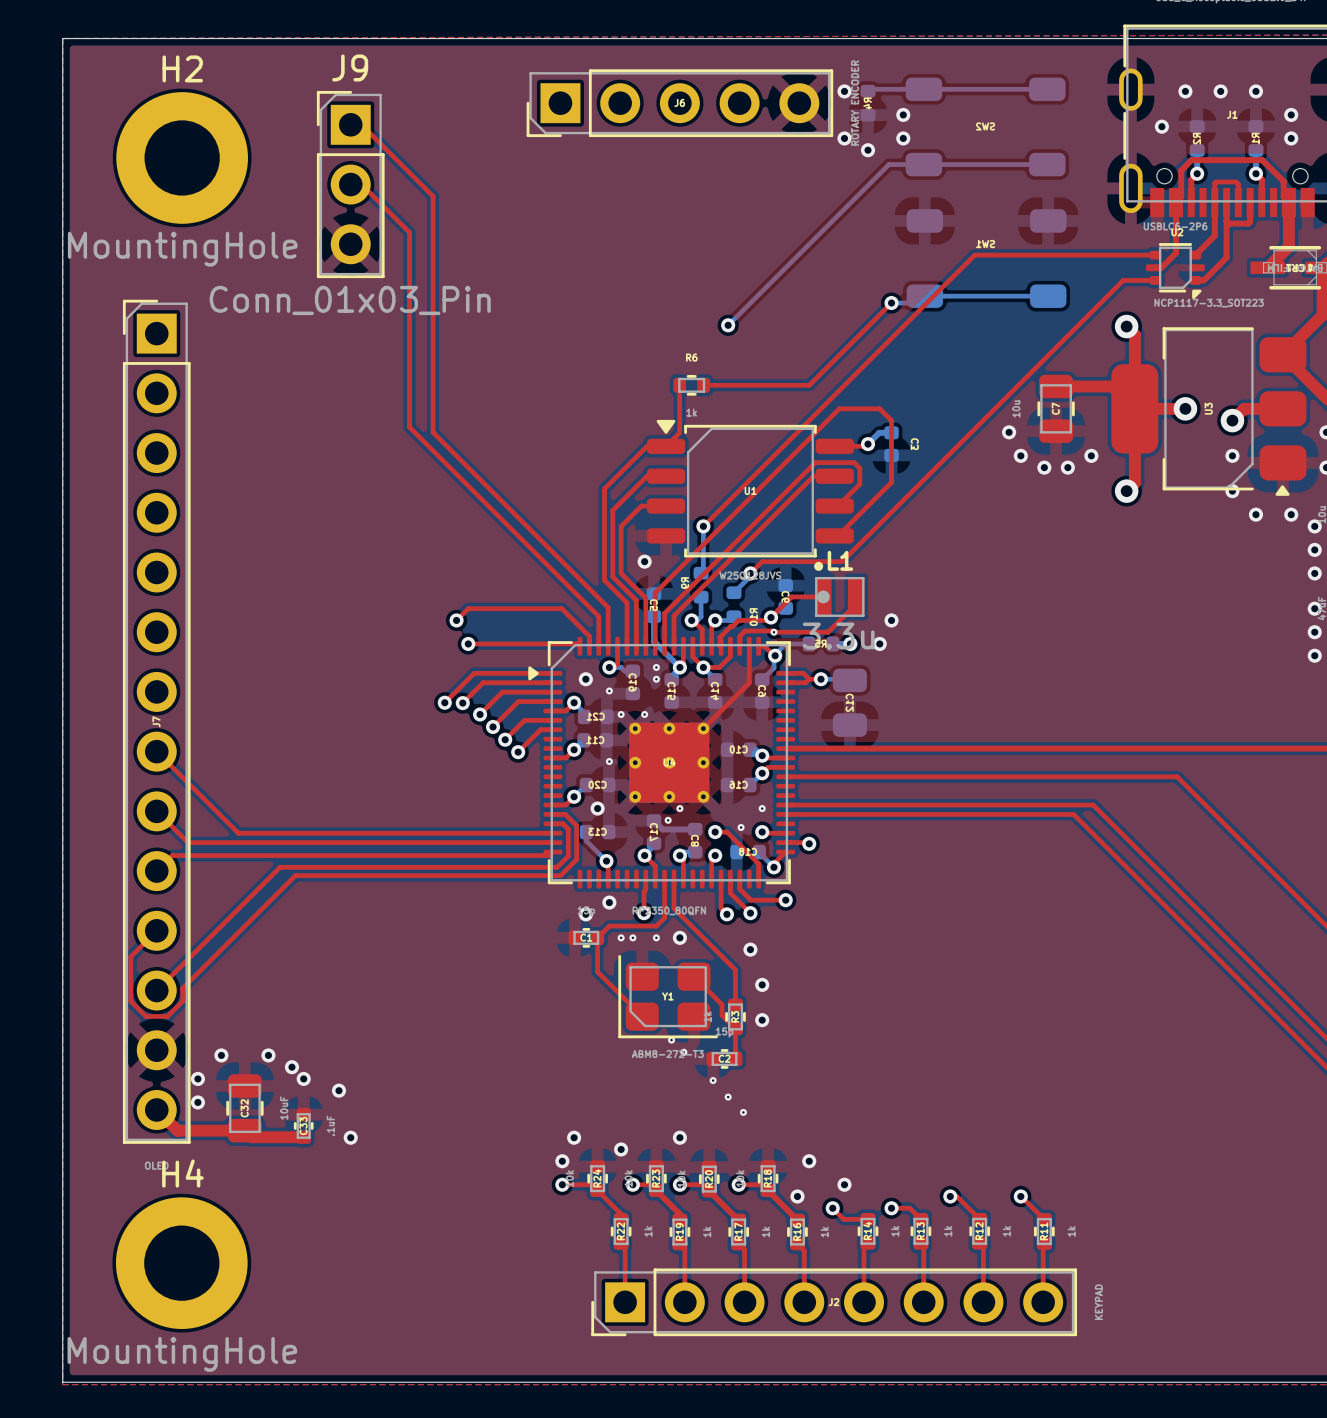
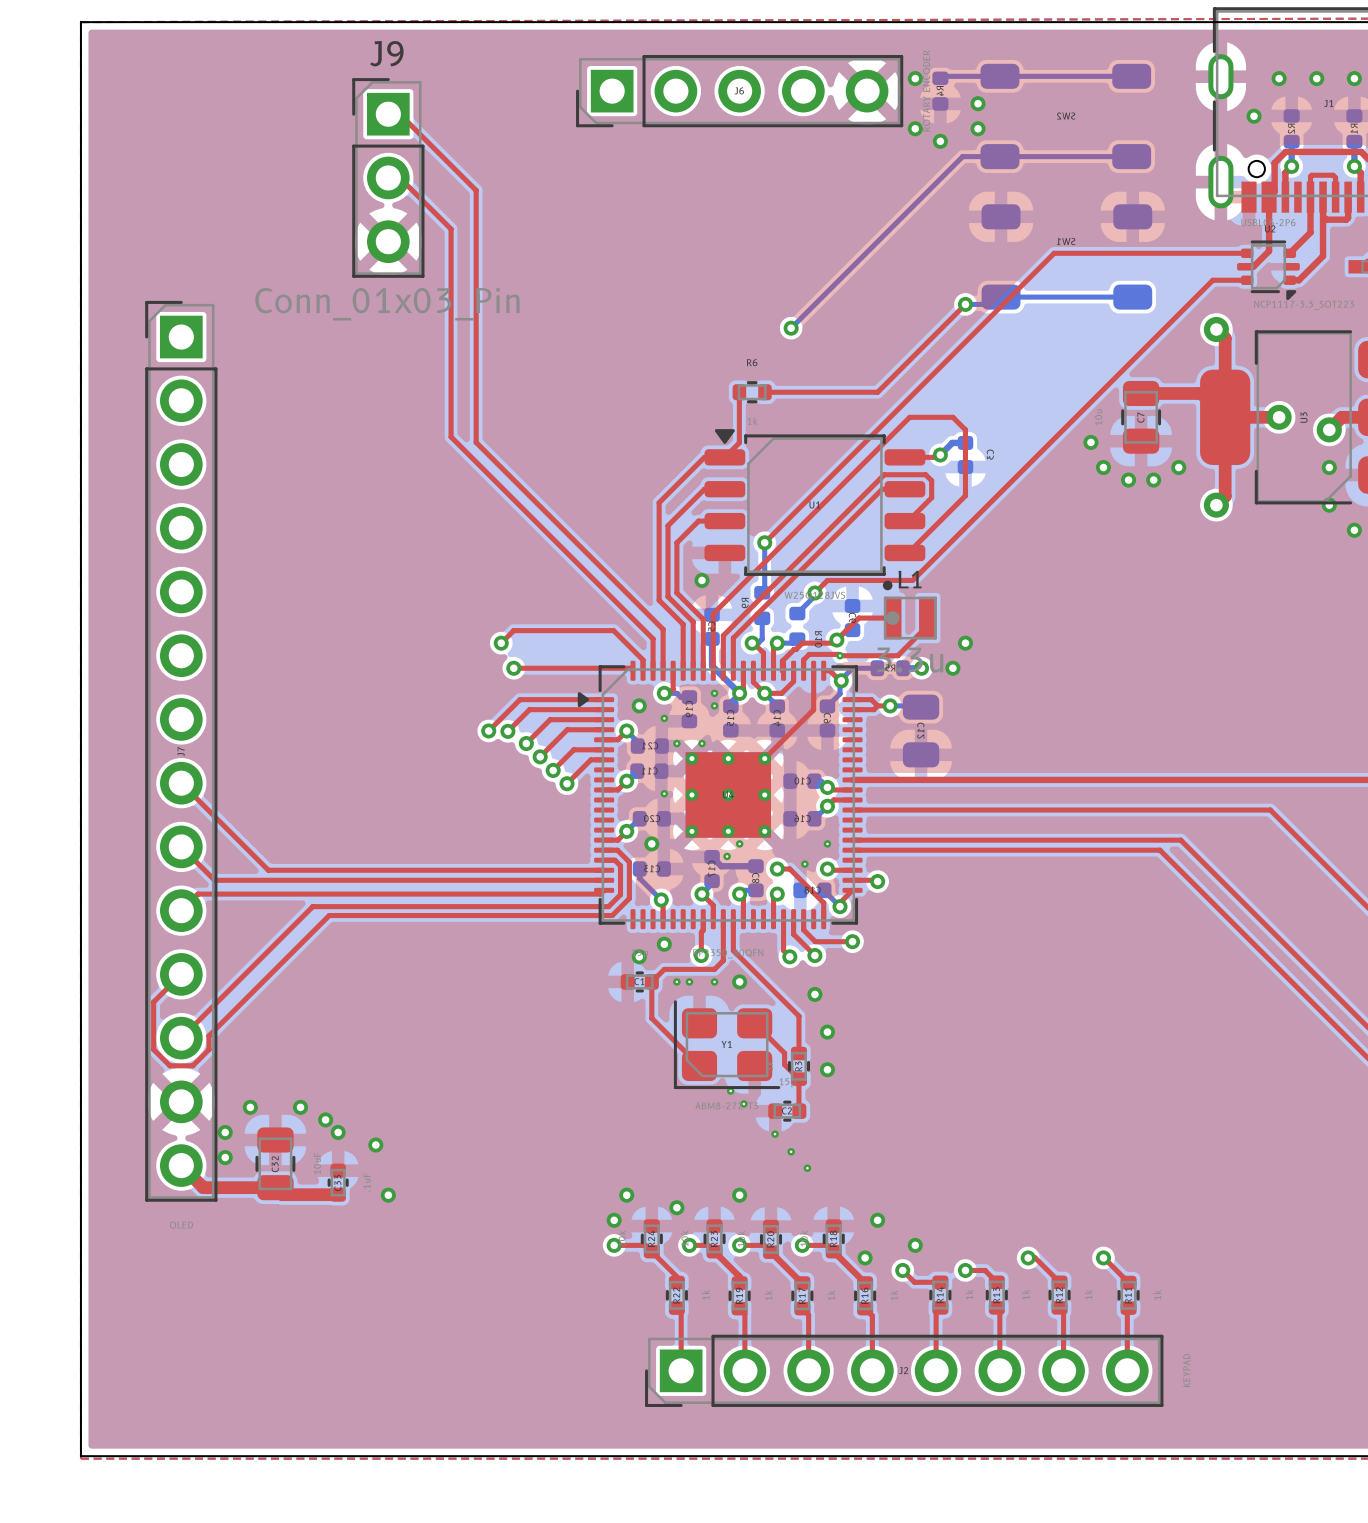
H2: MountingHole (182, 157) -> none
H4: MountingHole (181, 1263) -> none

